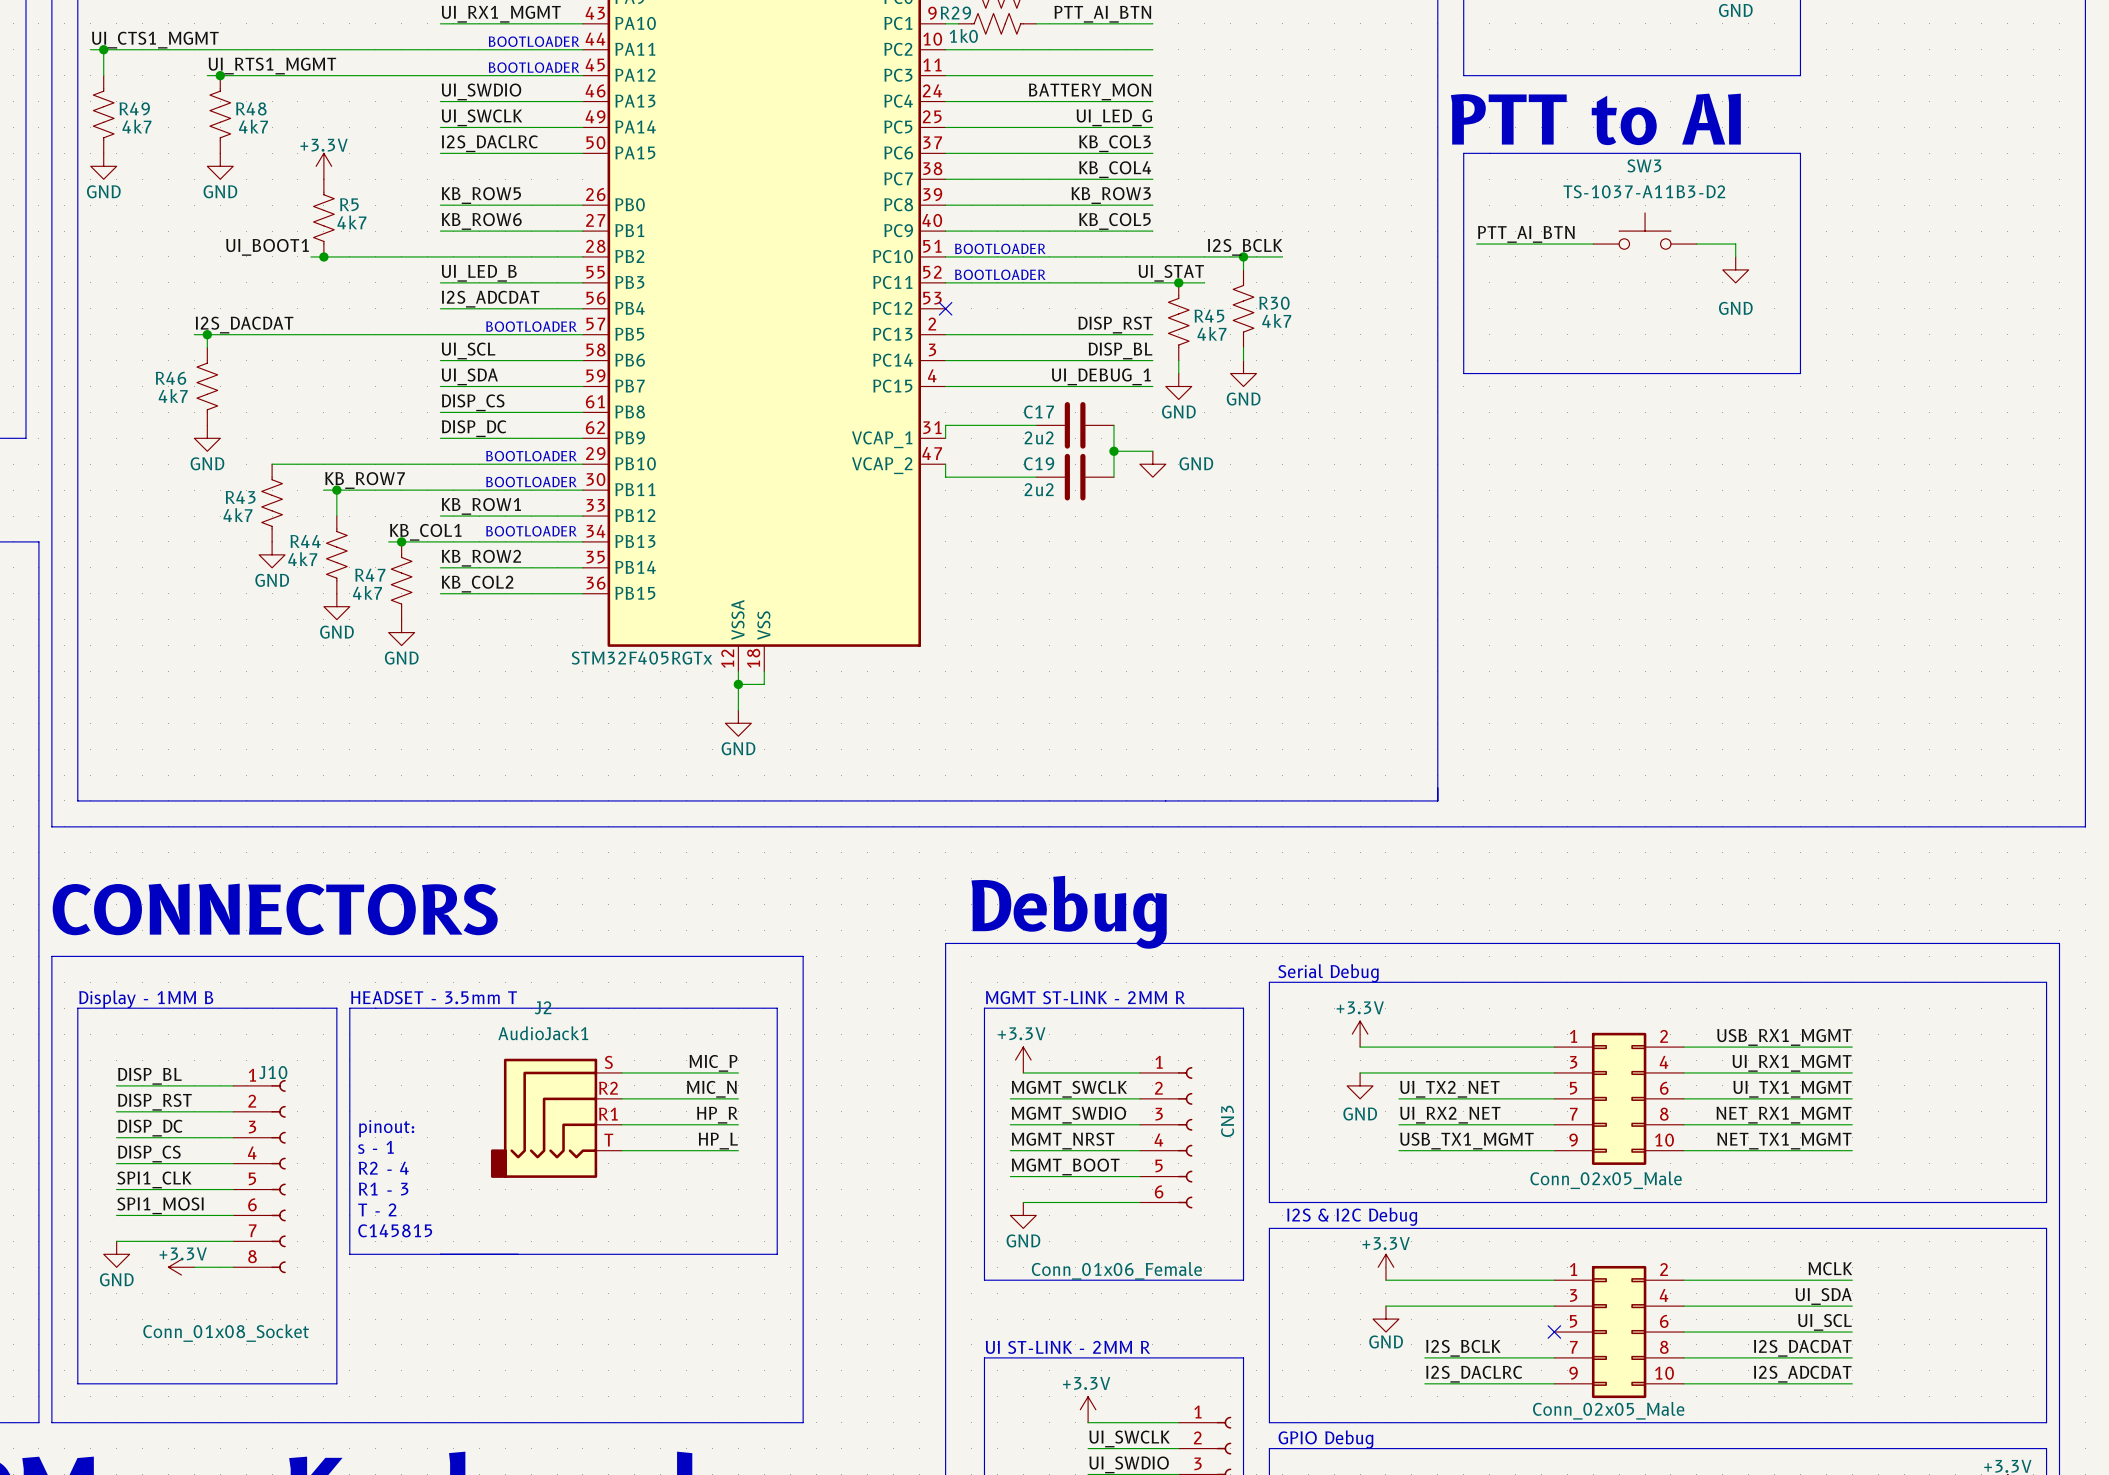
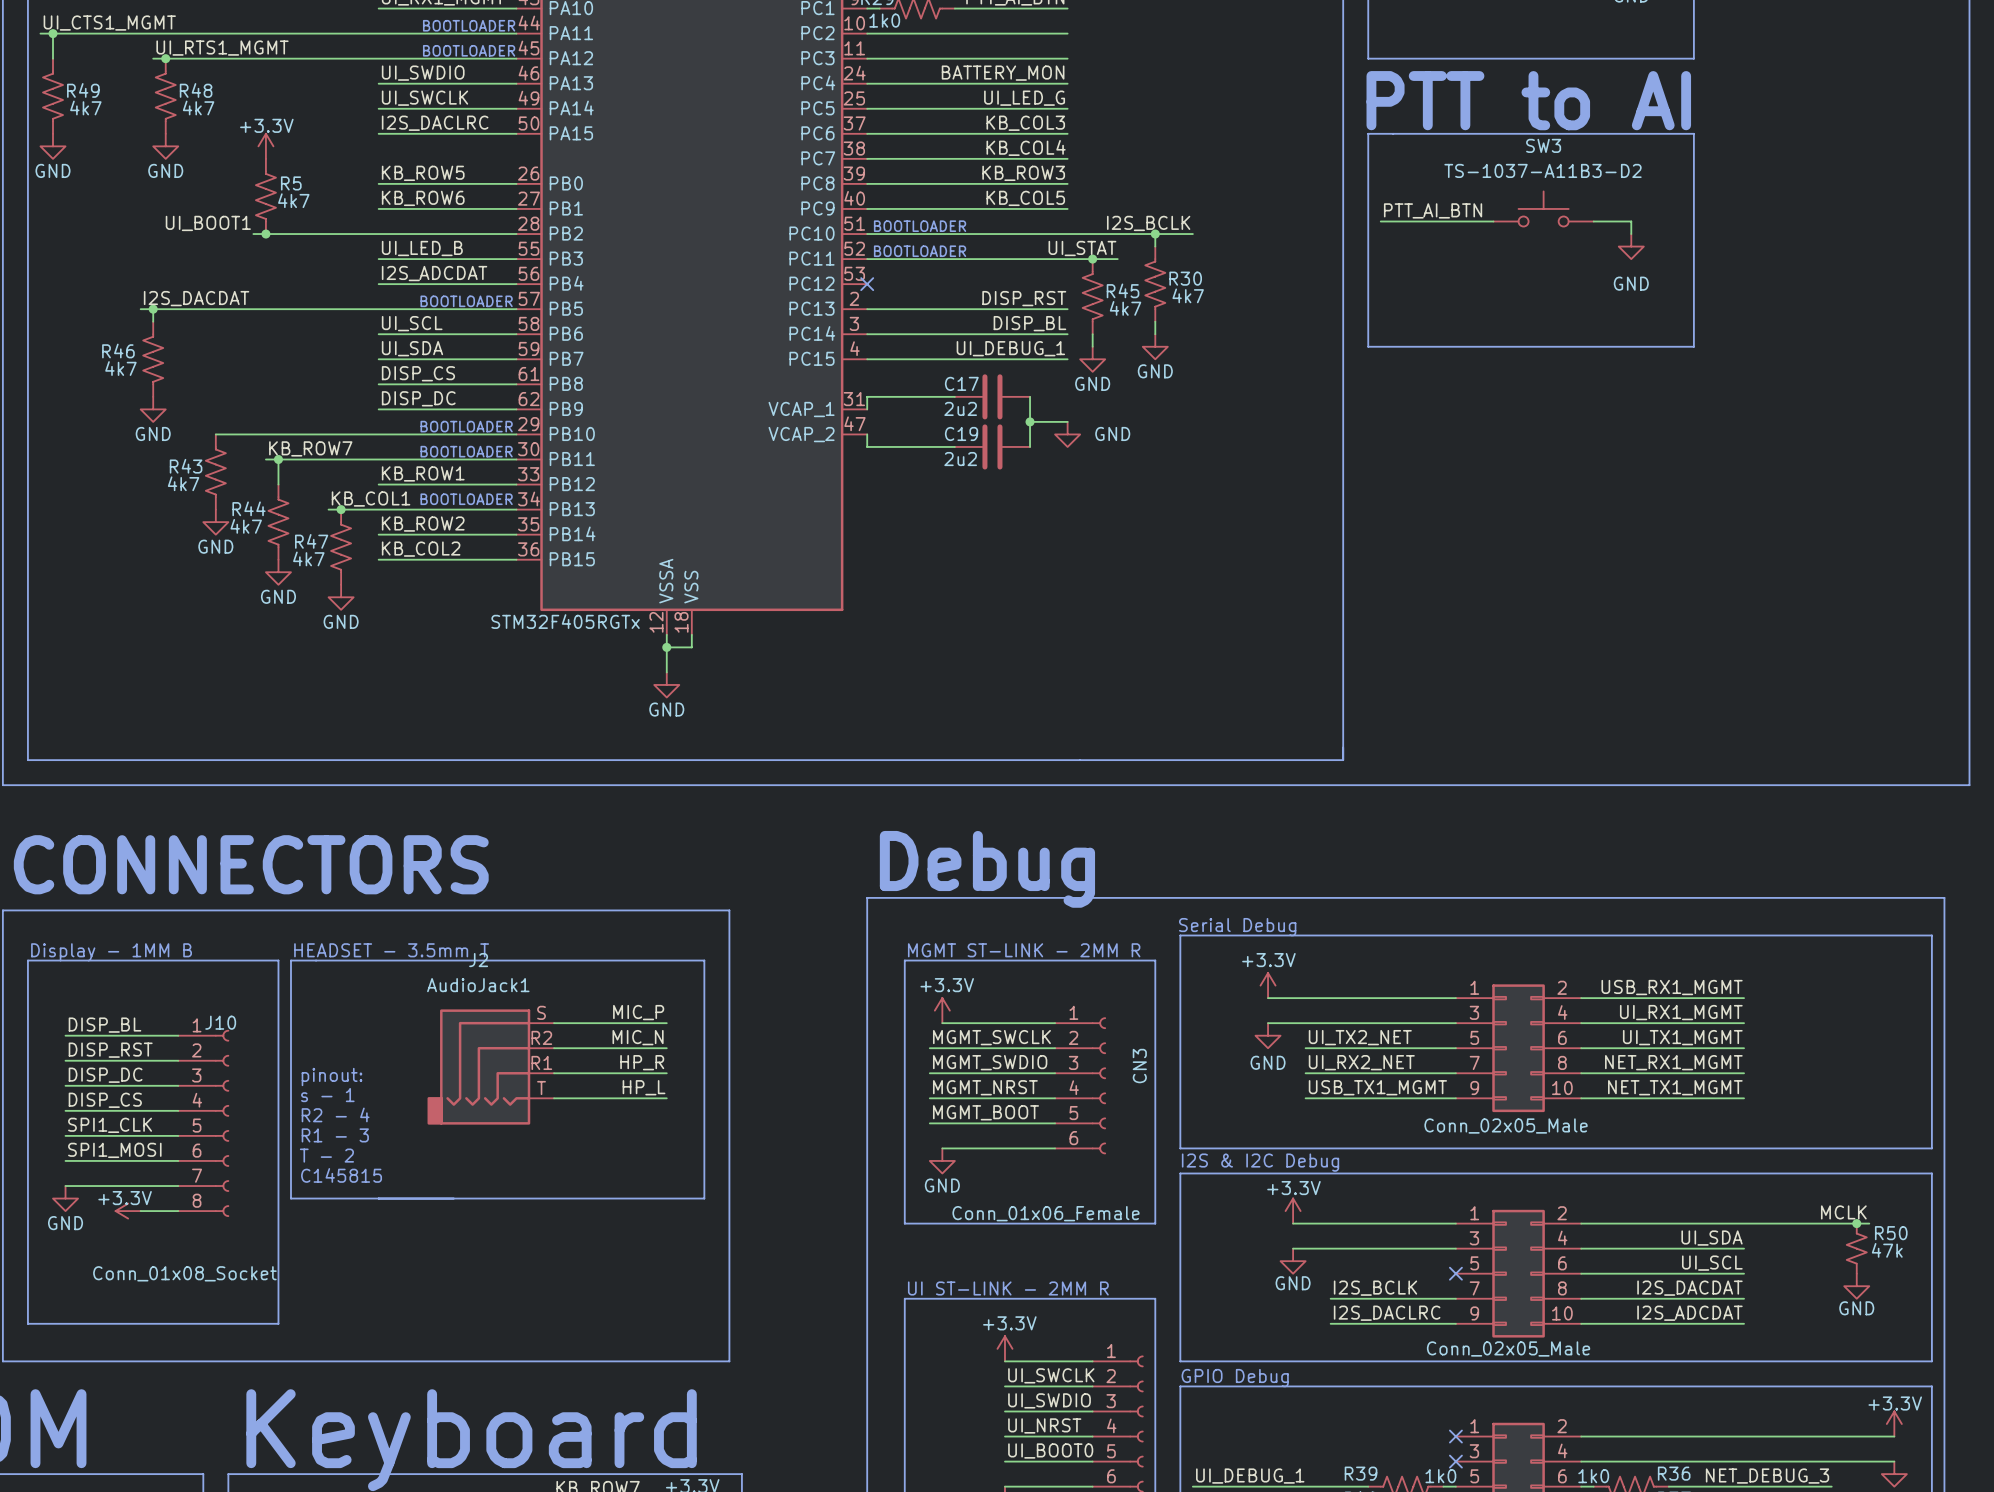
label position: MCLK (1830, 1268) -> MCLK (1843, 1212)
wire: none -> (1744, 1223) (1869, 1223)
junction: none -> (1856, 1223)
R50: none -> 47k (1856, 1248)
power symbol: none -> GND (1856, 1286)

